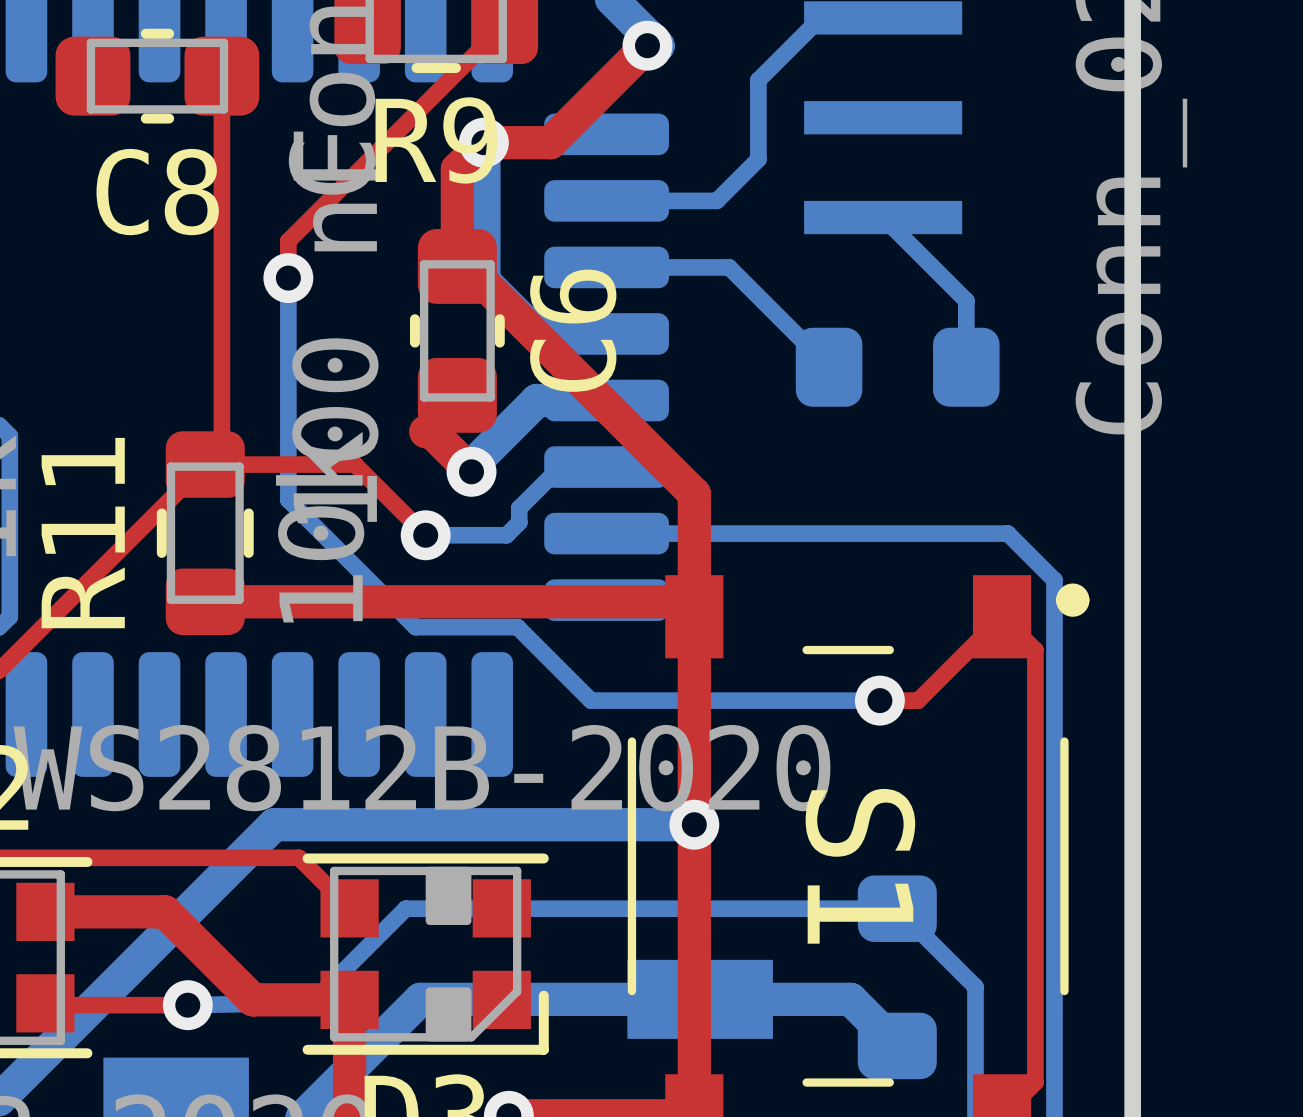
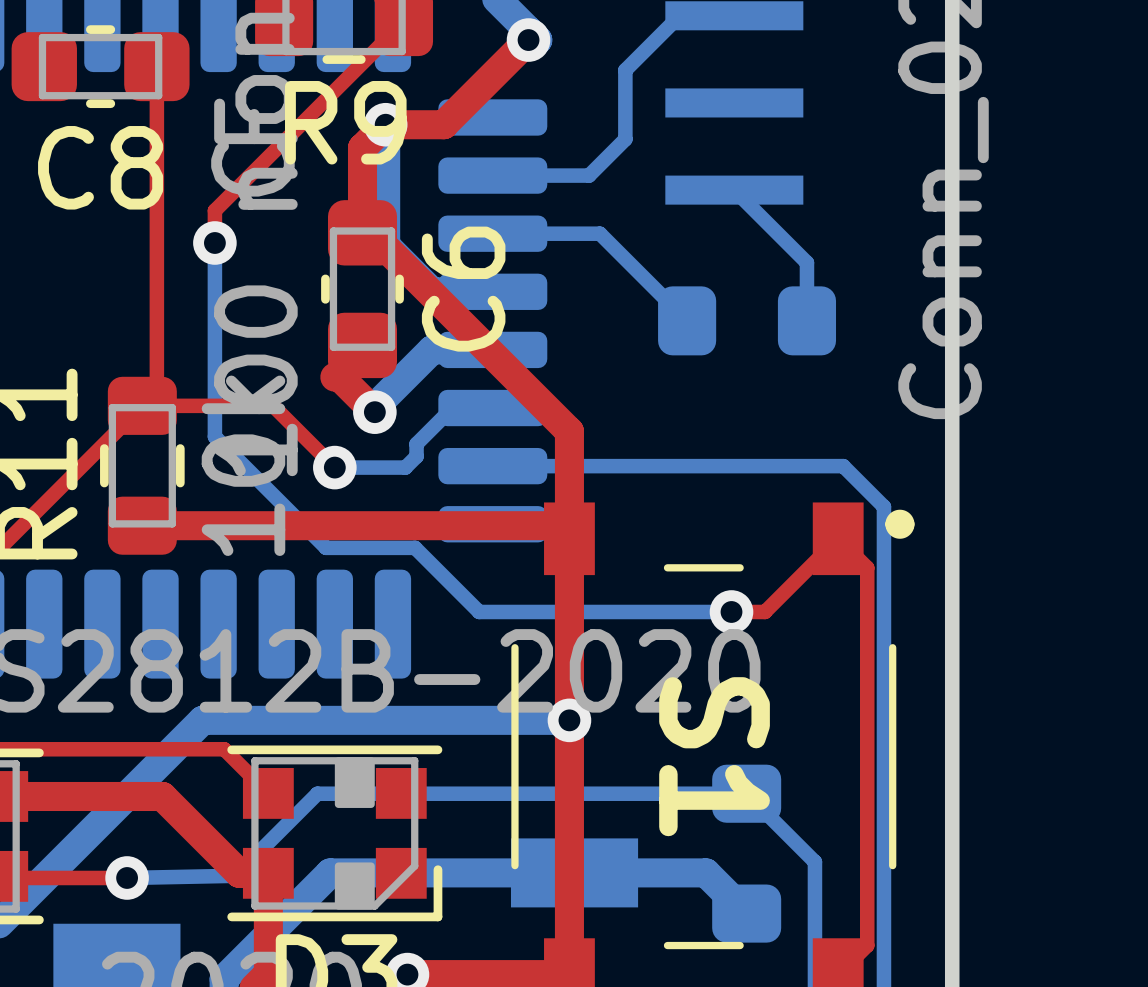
top track: (165, 911) (253, 999) (316, 999) -> (107, 796) (162, 796) (239, 873)

